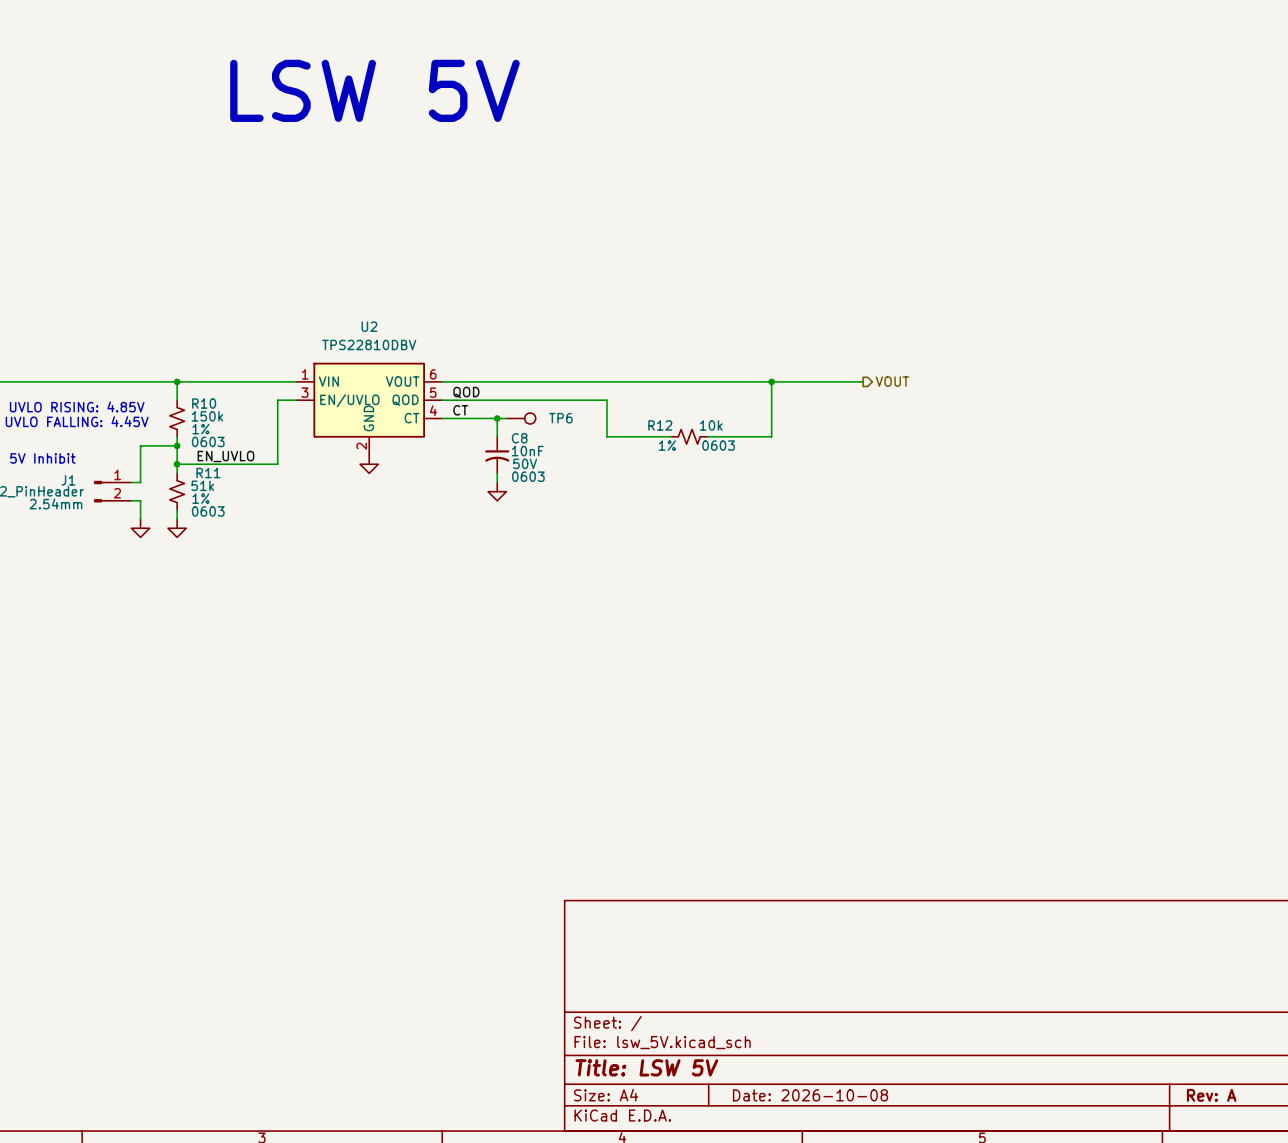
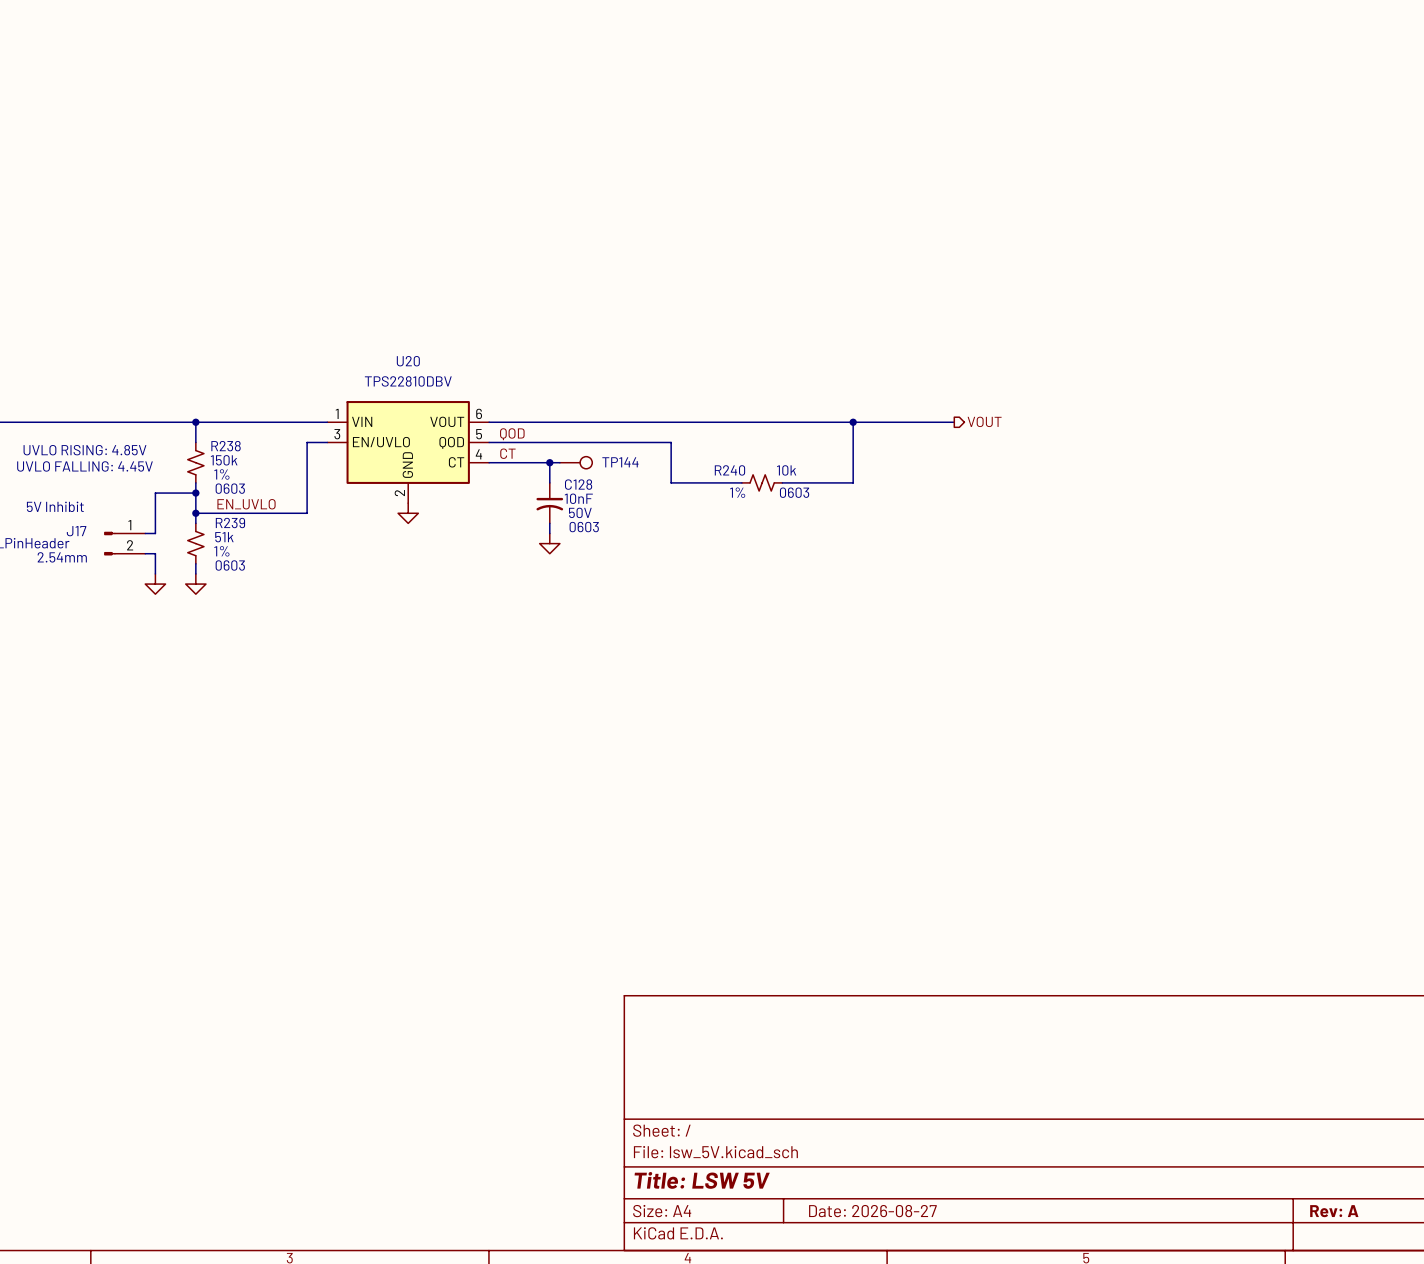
text: LSW 5V (374, 90) -> none
U2 name: U2 (369, 326) -> U20 (408, 361)
R10 name: R10 (204, 403) -> R238 (226, 446)
TP6 name: TP6 (560, 418) -> TP144 (620, 462)
R12 name: R12 (660, 425) -> R240 (729, 470)
C8 name: C8 (519, 438) -> C128 (578, 484)
R11 name: R11 (208, 473) -> R239 (230, 523)
J1 name: J1 (68, 480) -> J17 (76, 531)
title block: Date: 2026-10-08 (810, 1095) -> Date: 2026-08-27 (872, 1211)

